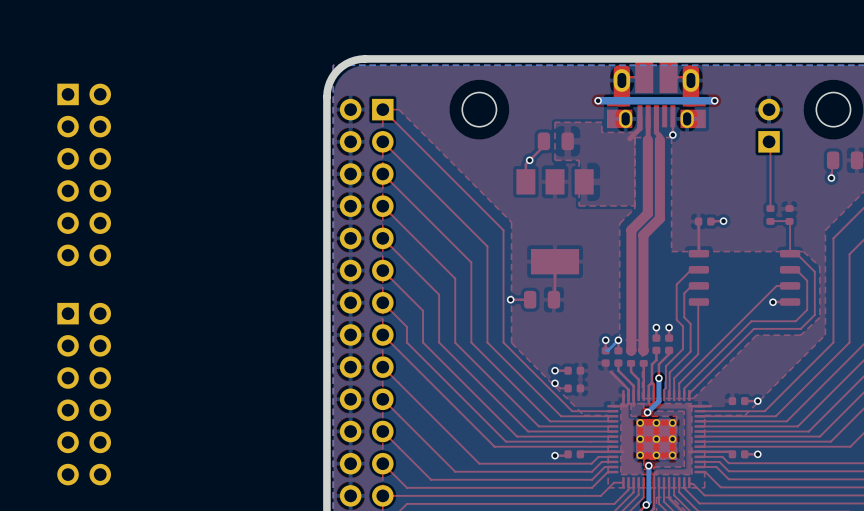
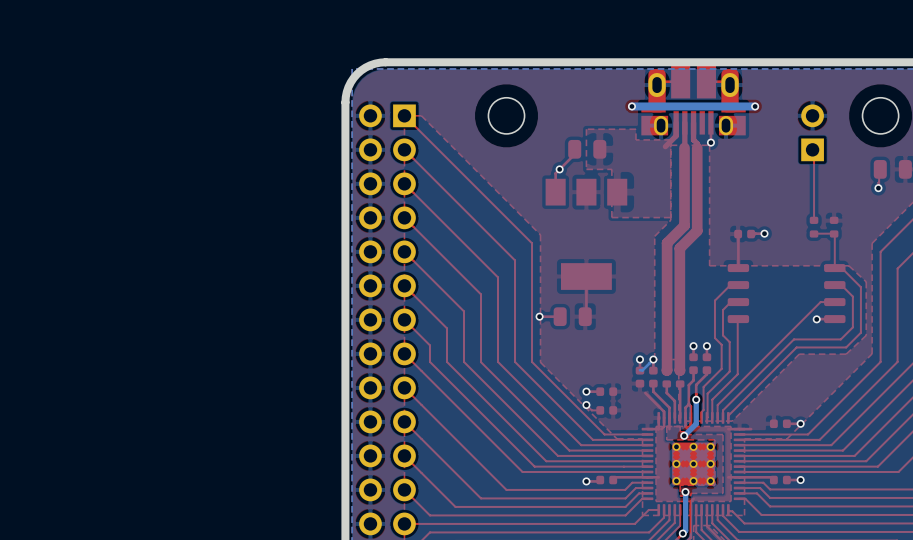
part: (84, 174) -> none
part: (84, 394) -> none

